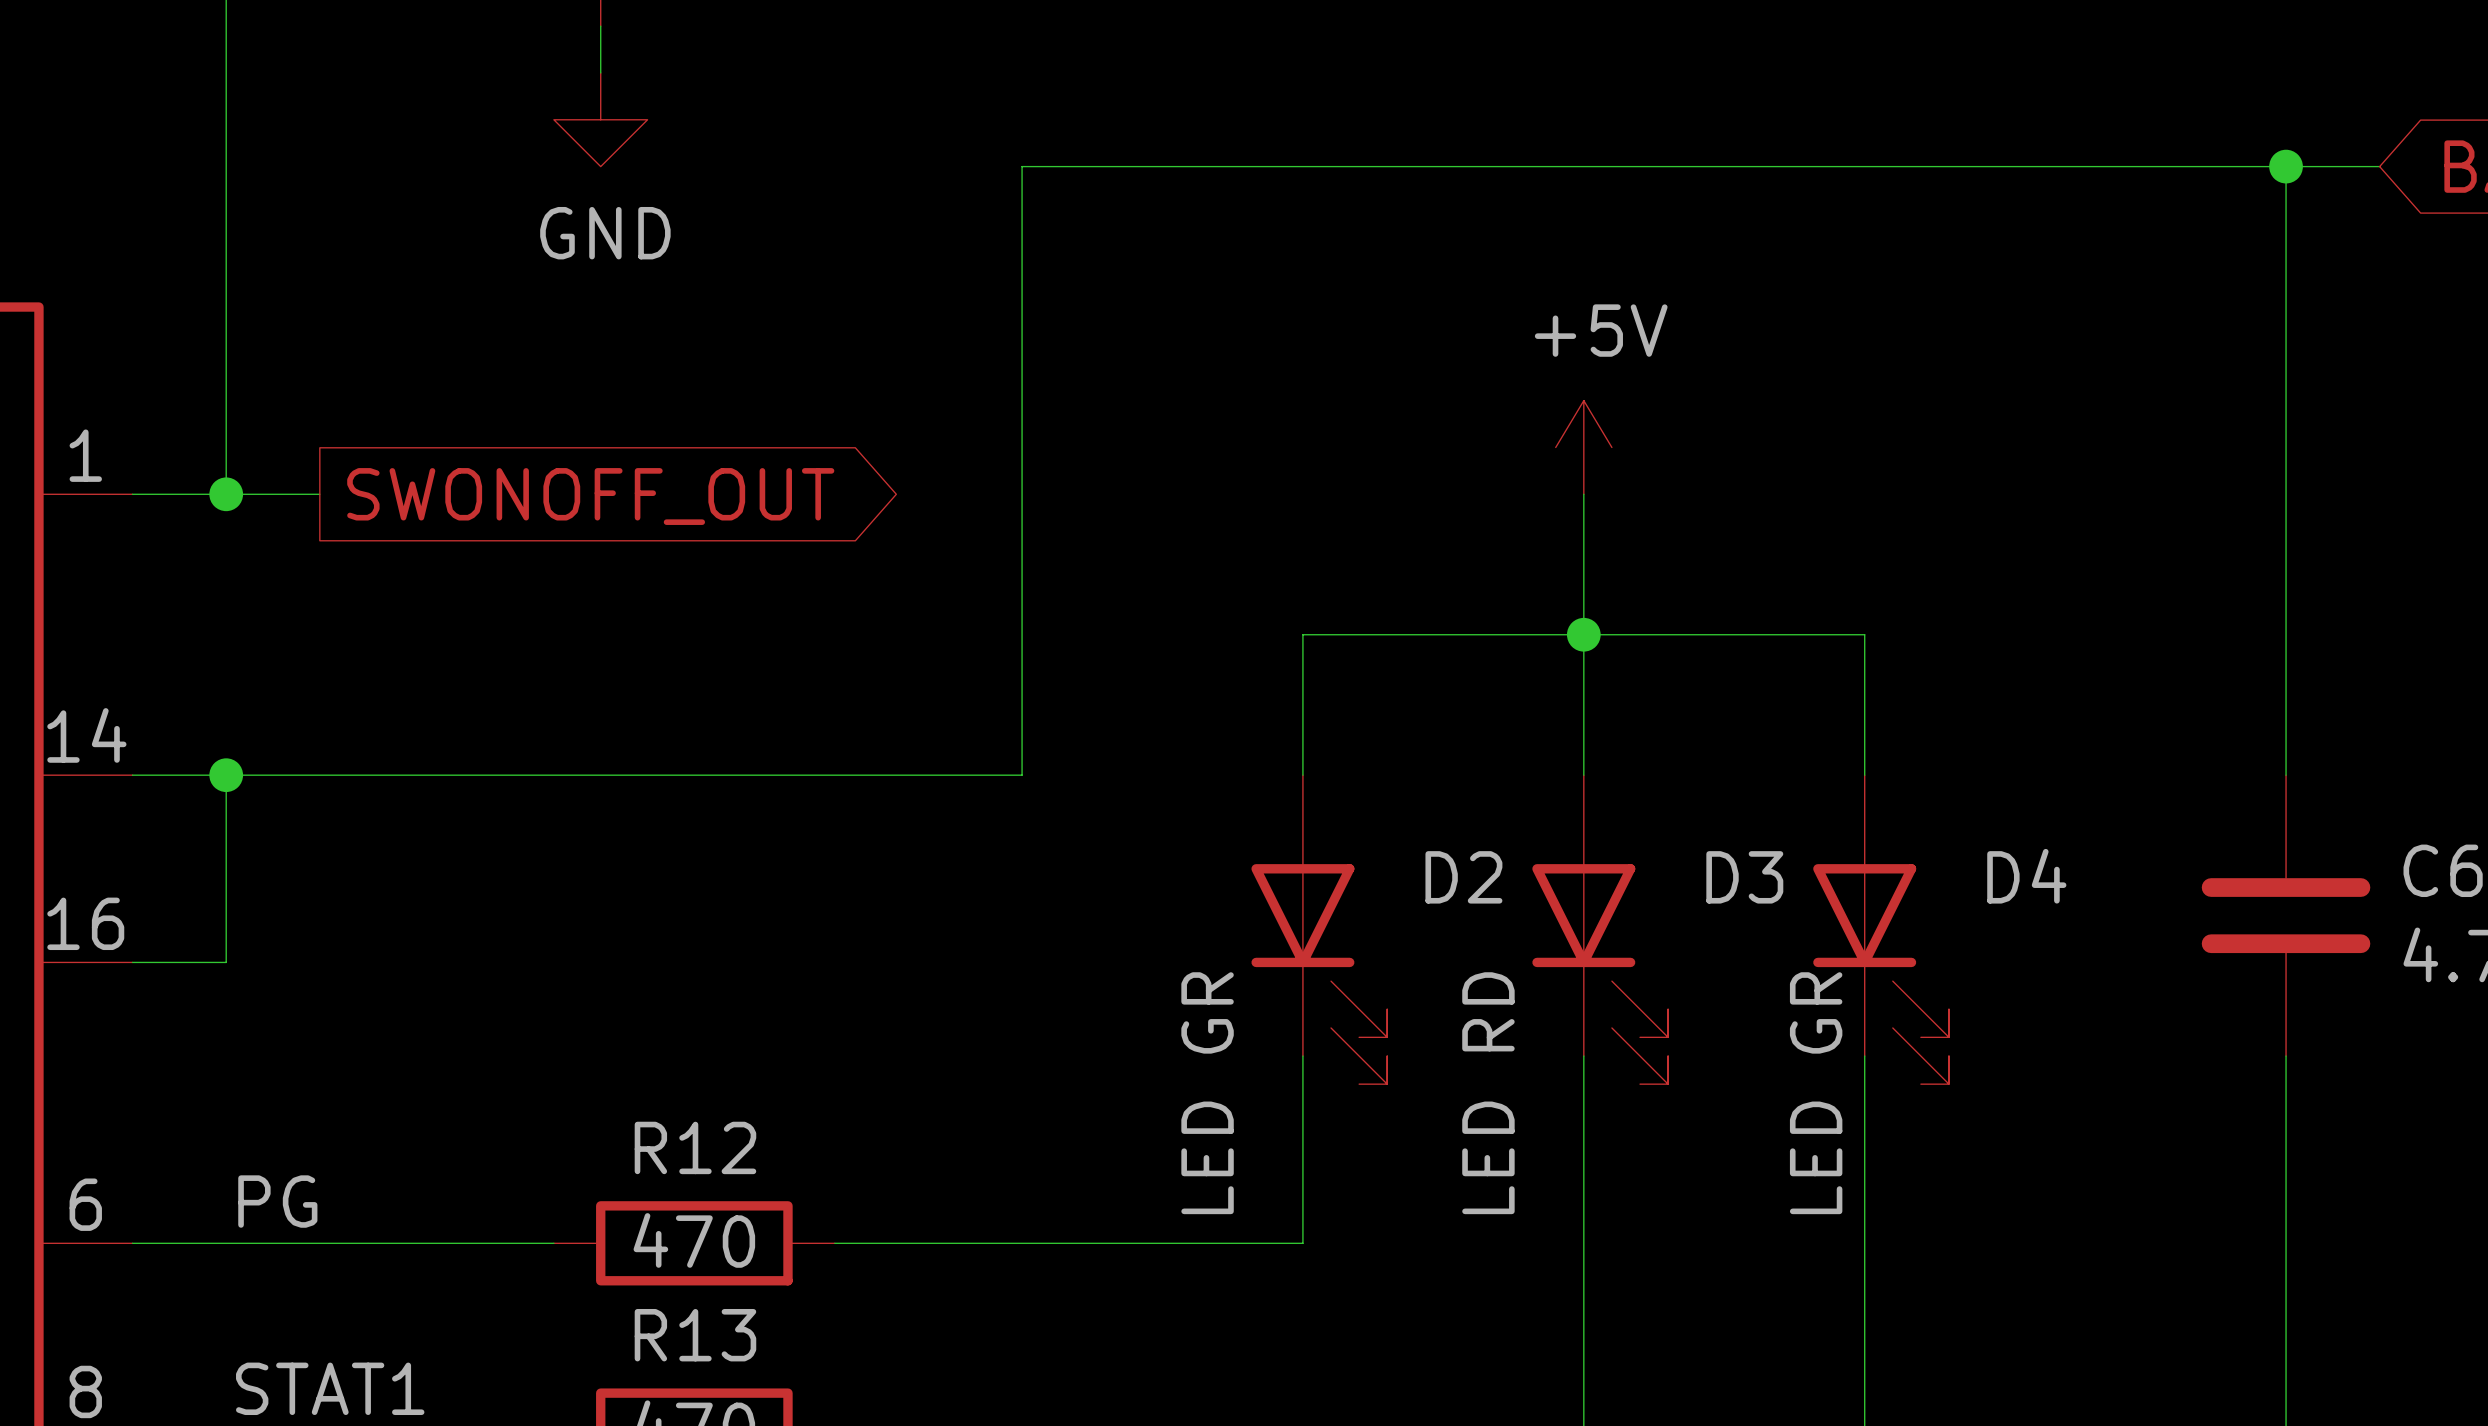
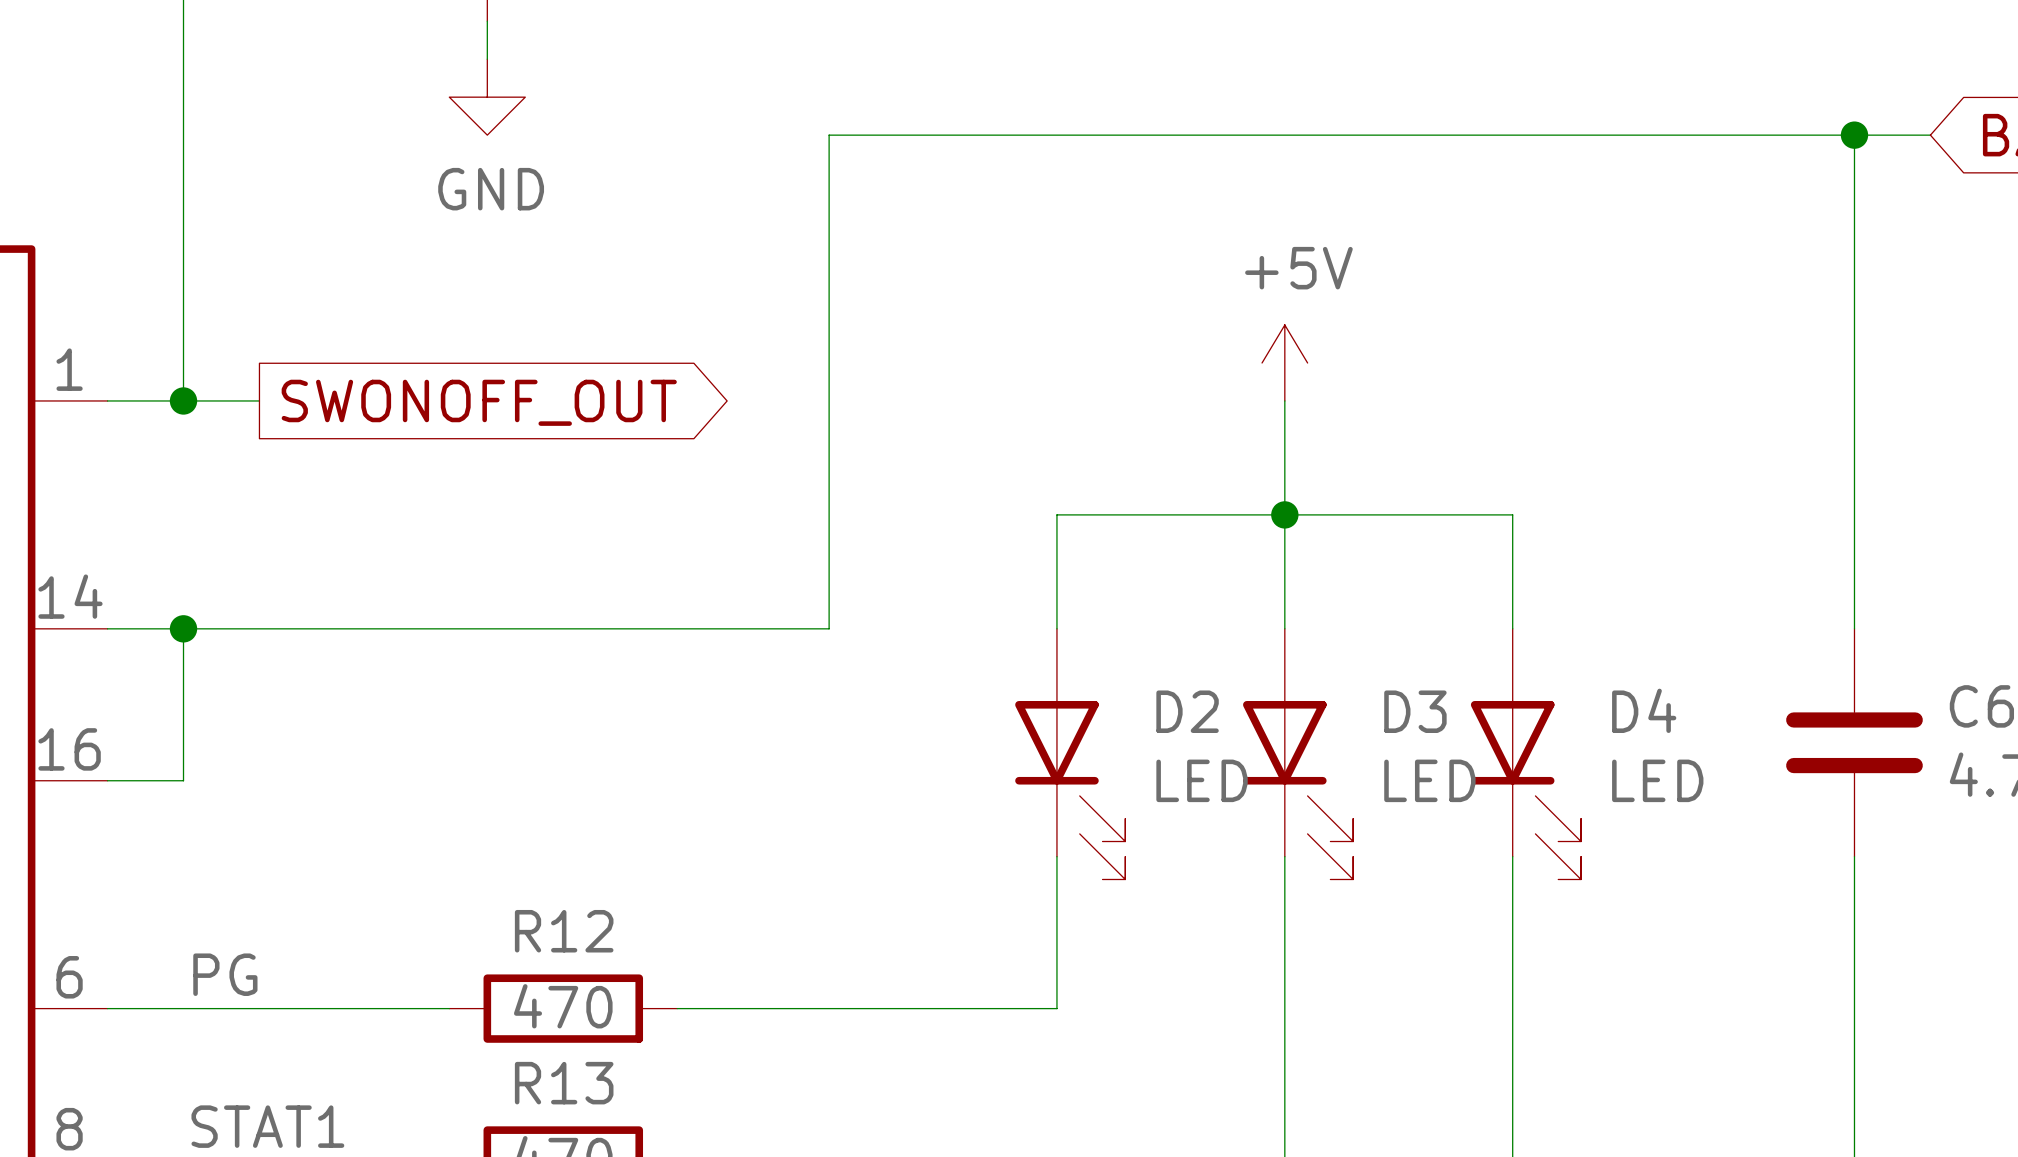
D2 value: LED GR (1207, 1093) -> LED (1202, 780)
D3 value: LED RD (1488, 1093) -> LED (1429, 780)
D4 value: LED GR (1816, 1093) -> LED (1657, 780)

